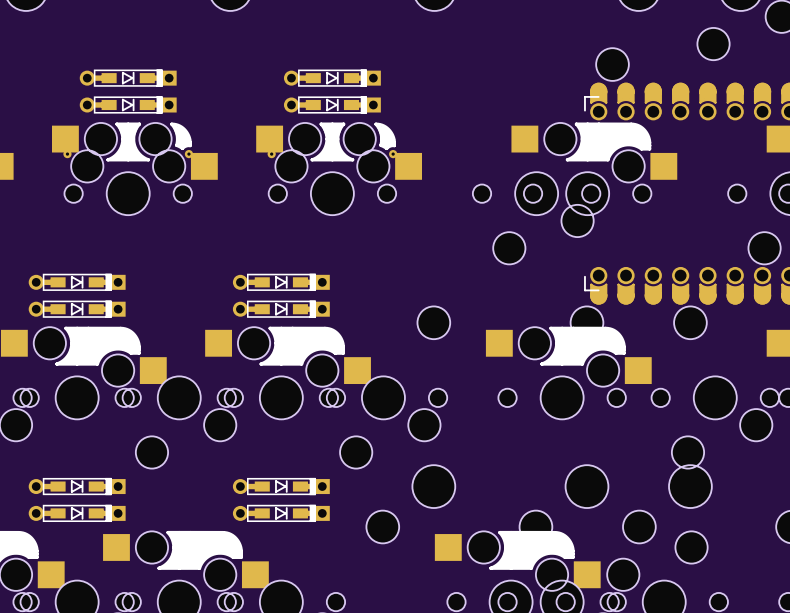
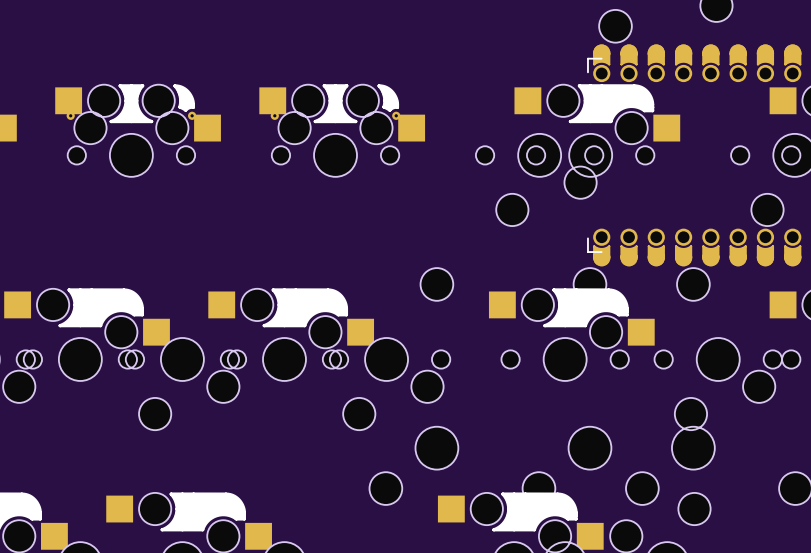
part: (128, 78) -> none
part: (332, 78) -> none
part: (128, 105) -> none
part: (332, 105) -> none
part: (77, 282) -> none
part: (281, 282) -> none
part: (77, 309) -> none
part: (281, 309) -> none
part: (77, 486) -> none
part: (281, 486) -> none
part: (77, 513) -> none
part: (281, 513) -> none

